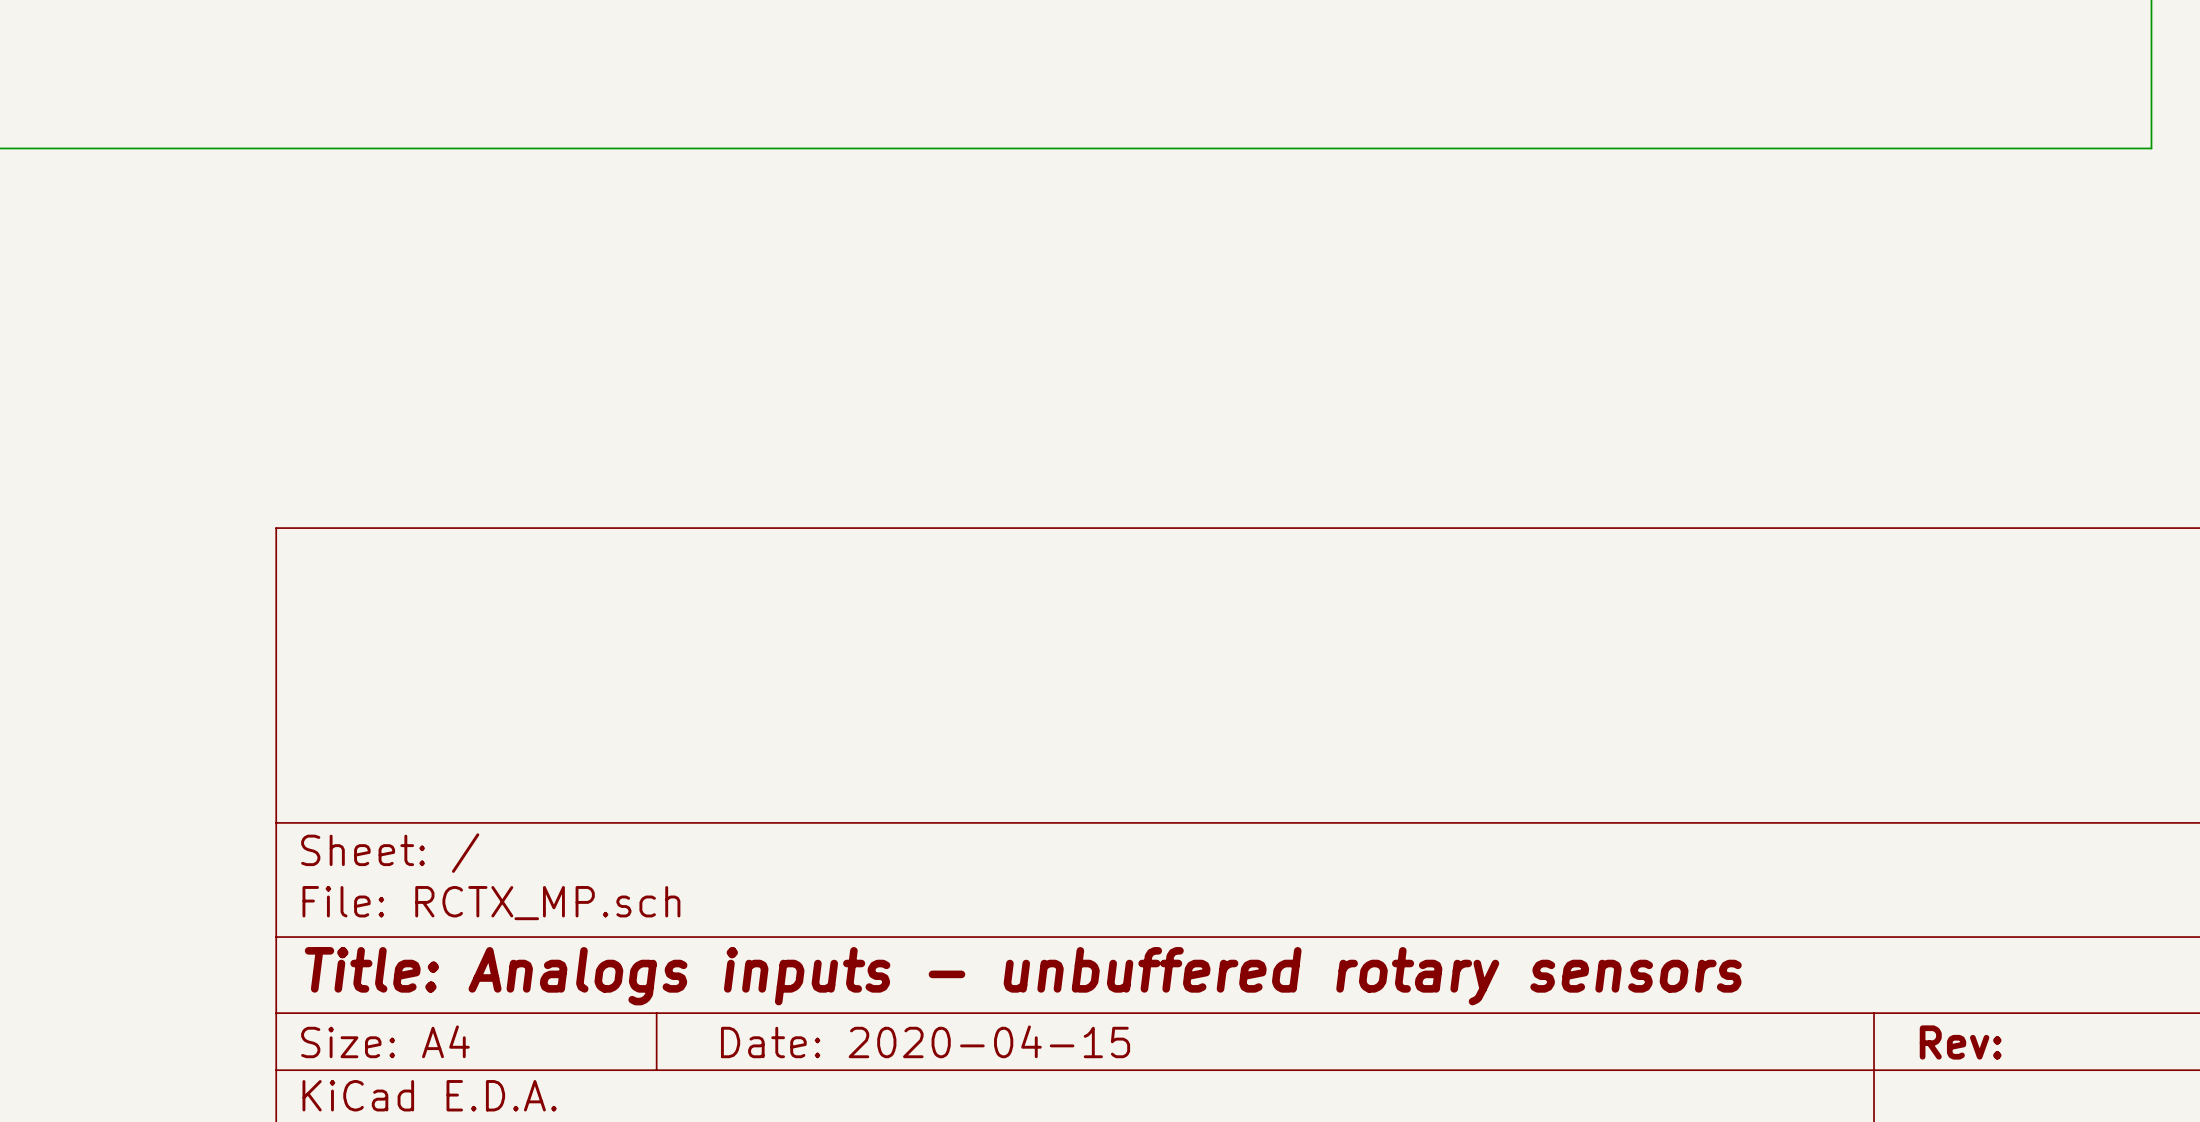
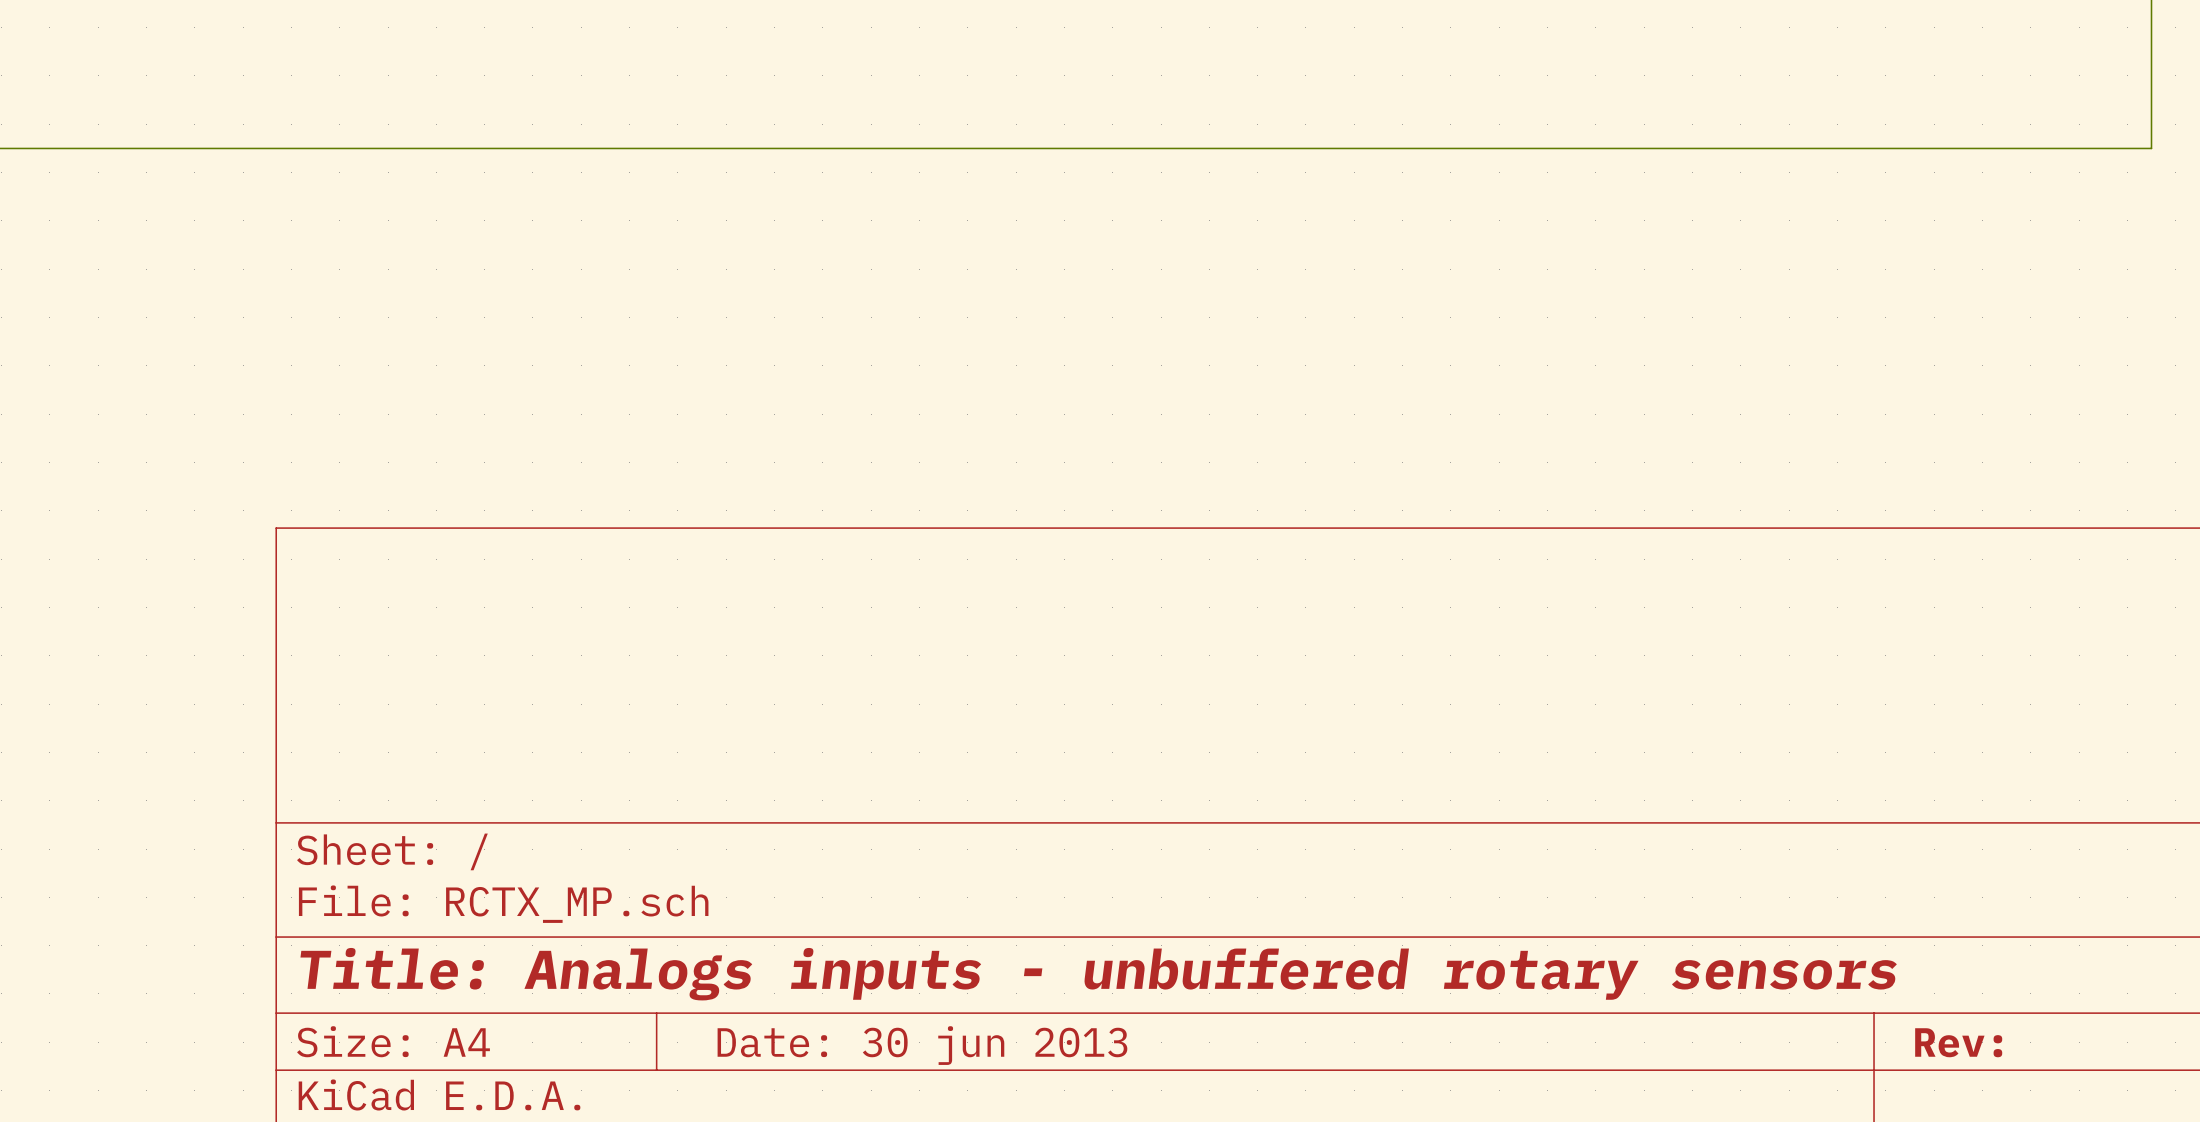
title block: Date: 2020-04-15 (925, 1041) -> Date: 30 jun 2013 (922, 1045)

